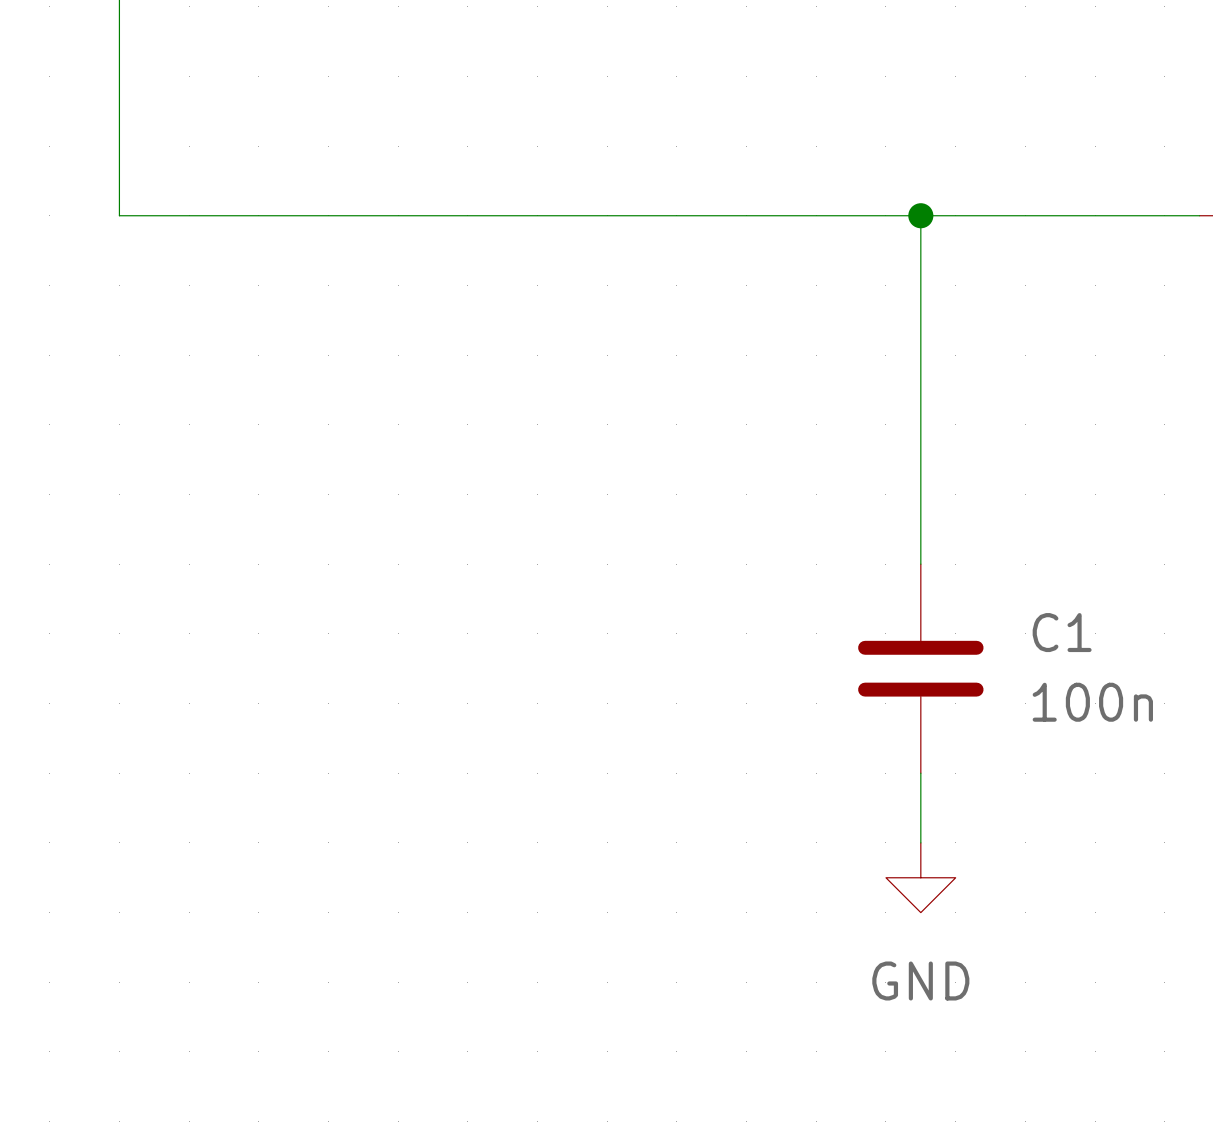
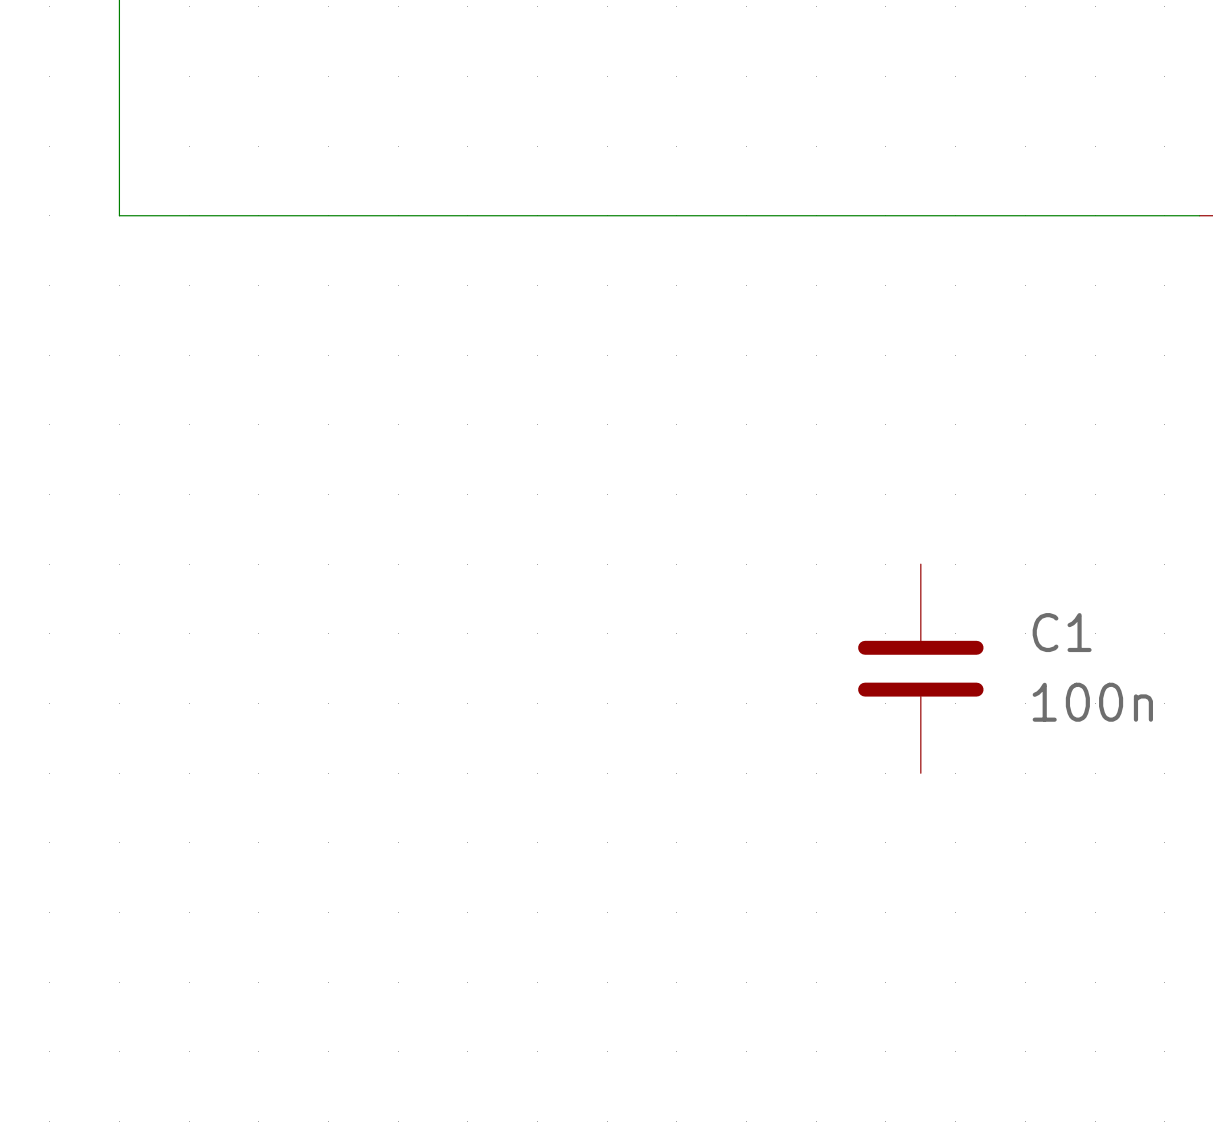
wire: (920, 215) (920, 564) -> none
junction: (920, 215) -> none
wire: (920, 773) (920, 842) -> none
power symbol: GND (920, 877) -> none

